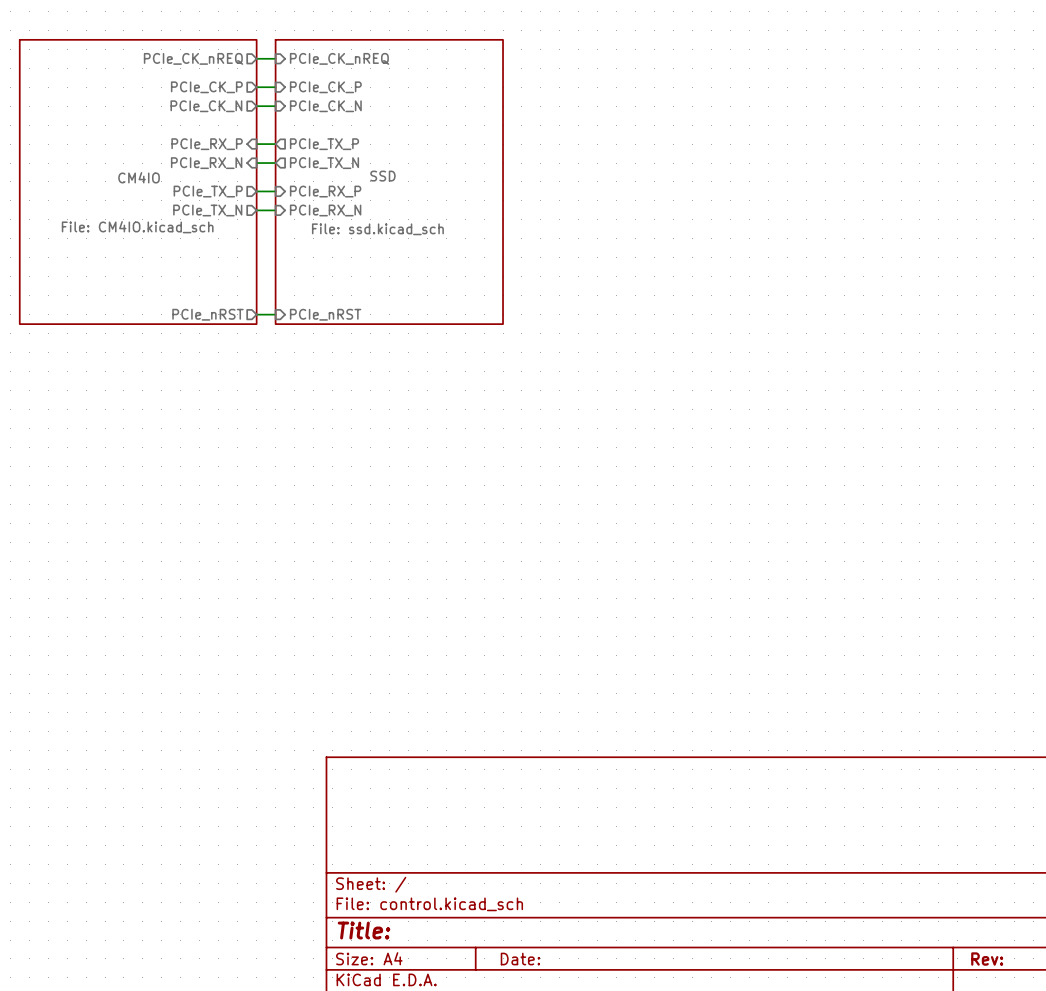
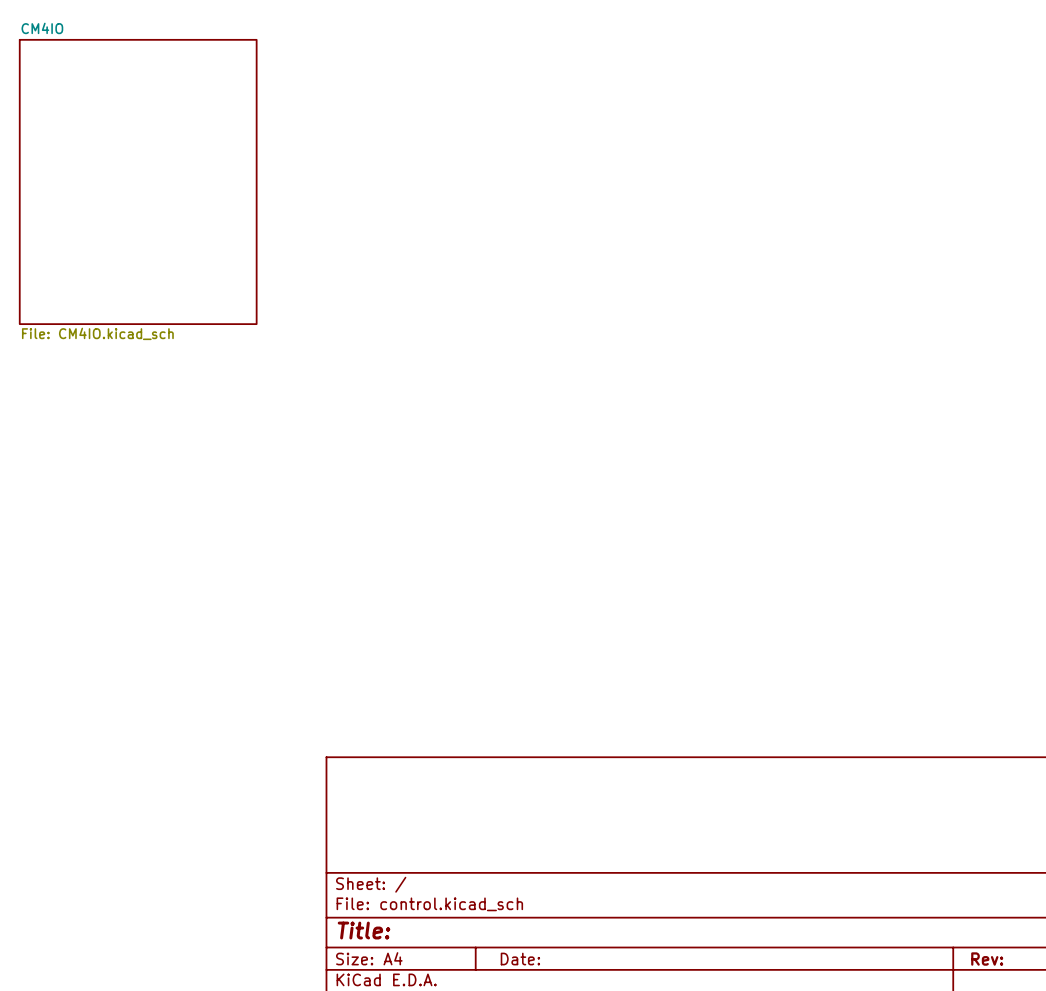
sheet pin: PCIe_CK_nREQ (193, 58) -> none
wire: (256, 58) (275, 58) -> none
sheet pin: PCIe_CK_nREQ (339, 58) -> none
sheet pin: PCIe_CK_P (206, 87) -> none
wire: (256, 87) (275, 87) -> none
sheet pin: PCIe_CK_P (325, 87) -> none
sheet pin: PCIe_CK_N (206, 106) -> none
wire: (256, 106) (275, 106) -> none
sheet pin: PCIe_CK_N (325, 106) -> none
sheet pin: PCIe_RX_P (207, 144) -> none
wire: (256, 144) (275, 144) -> none
sheet pin: PCIe_TX_P (324, 144) -> none
sheet pin: PCIe_RX_N (206, 163) -> none
wire: (256, 163) (275, 163) -> none
sheet pin: PCIe_TX_N (324, 163) -> none
sheet CM4IO name position: CM4IO (139, 177) -> CM4IO (42, 28)
sheet SSD: File: ssd.kicad_sch (389, 181) -> none
sheet pin: PCIe_TX_P (208, 191) -> none
wire: (256, 191) (275, 191) -> none
sheet pin: PCIe_RX_P (325, 191) -> none
sheet pin: PCIe_TX_N (207, 210) -> none
wire: (256, 210) (275, 210) -> none
sheet pin: PCIe_RX_N (325, 210) -> none
sheet CM4IO value position: File: CM4IO.kicad_sch (137, 227) -> File: CM4IO.kicad_sch (97, 333)
sheet pin: PCIe_nRST (207, 314) -> none
wire: (256, 314) (275, 314) -> none
sheet pin: PCIe_nRST (325, 314) -> none

